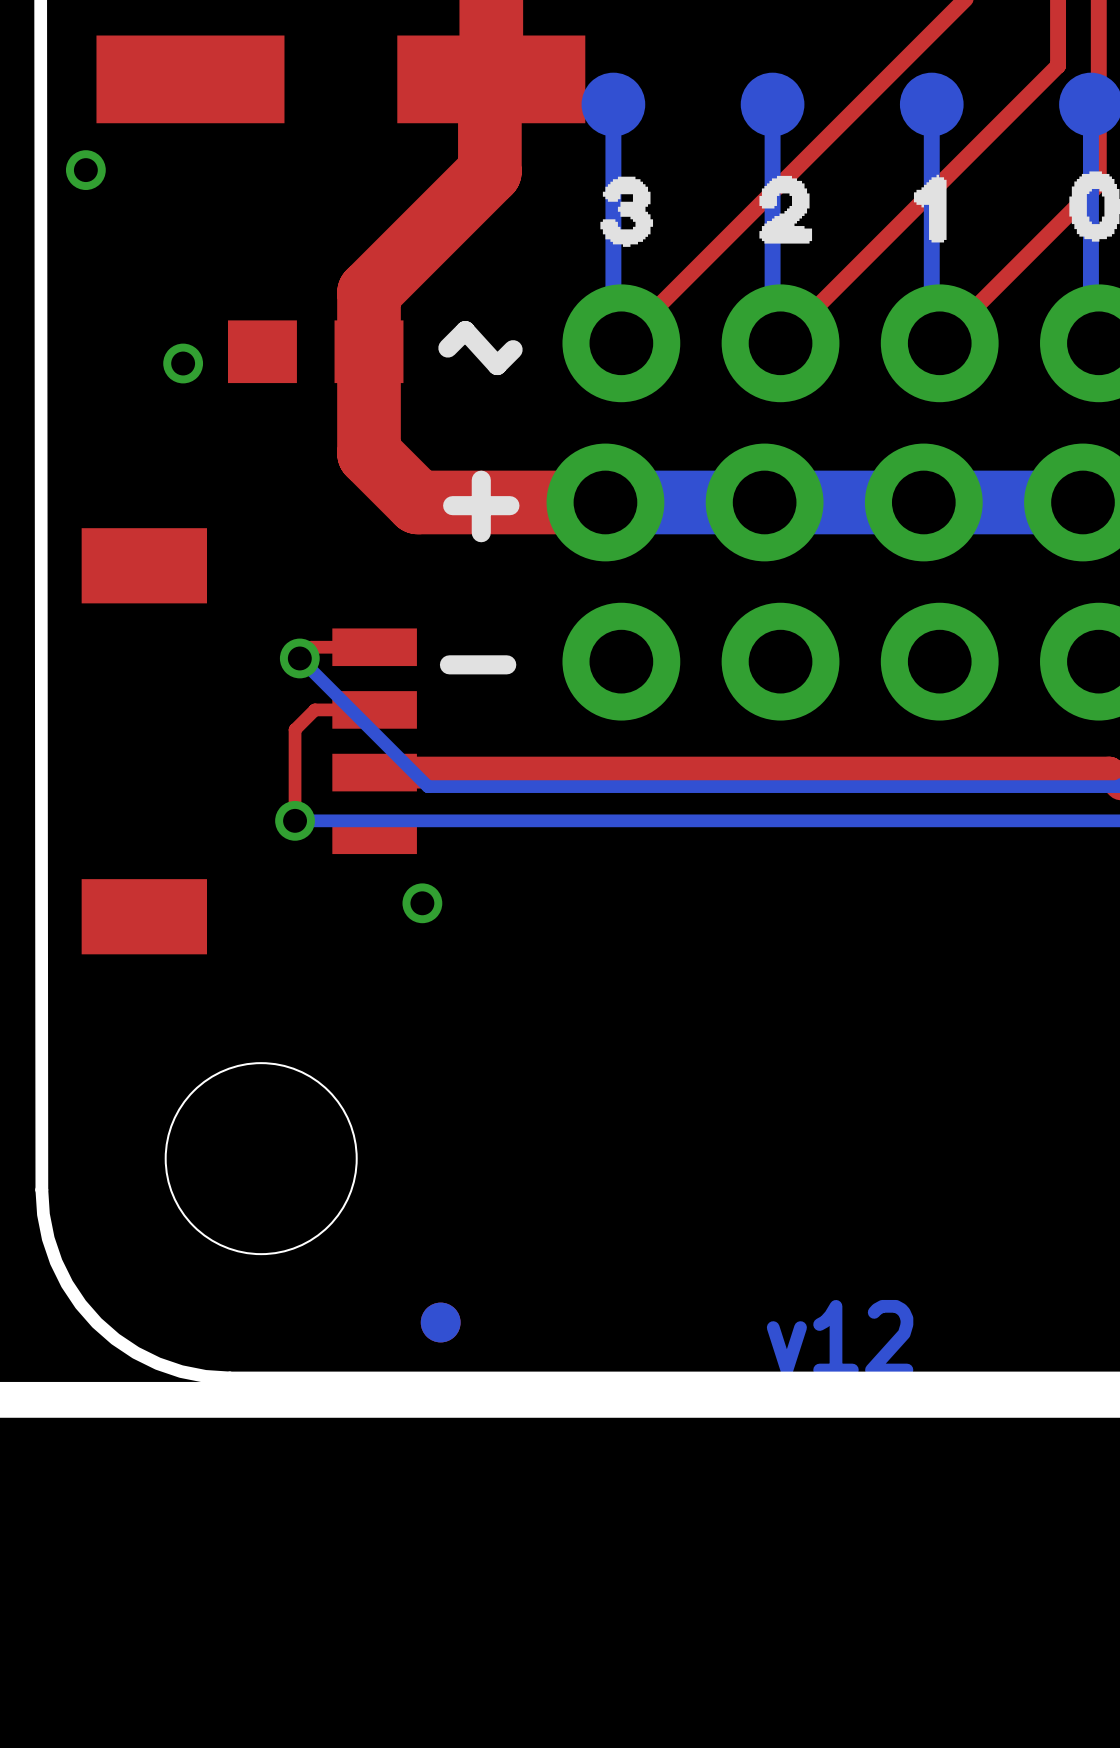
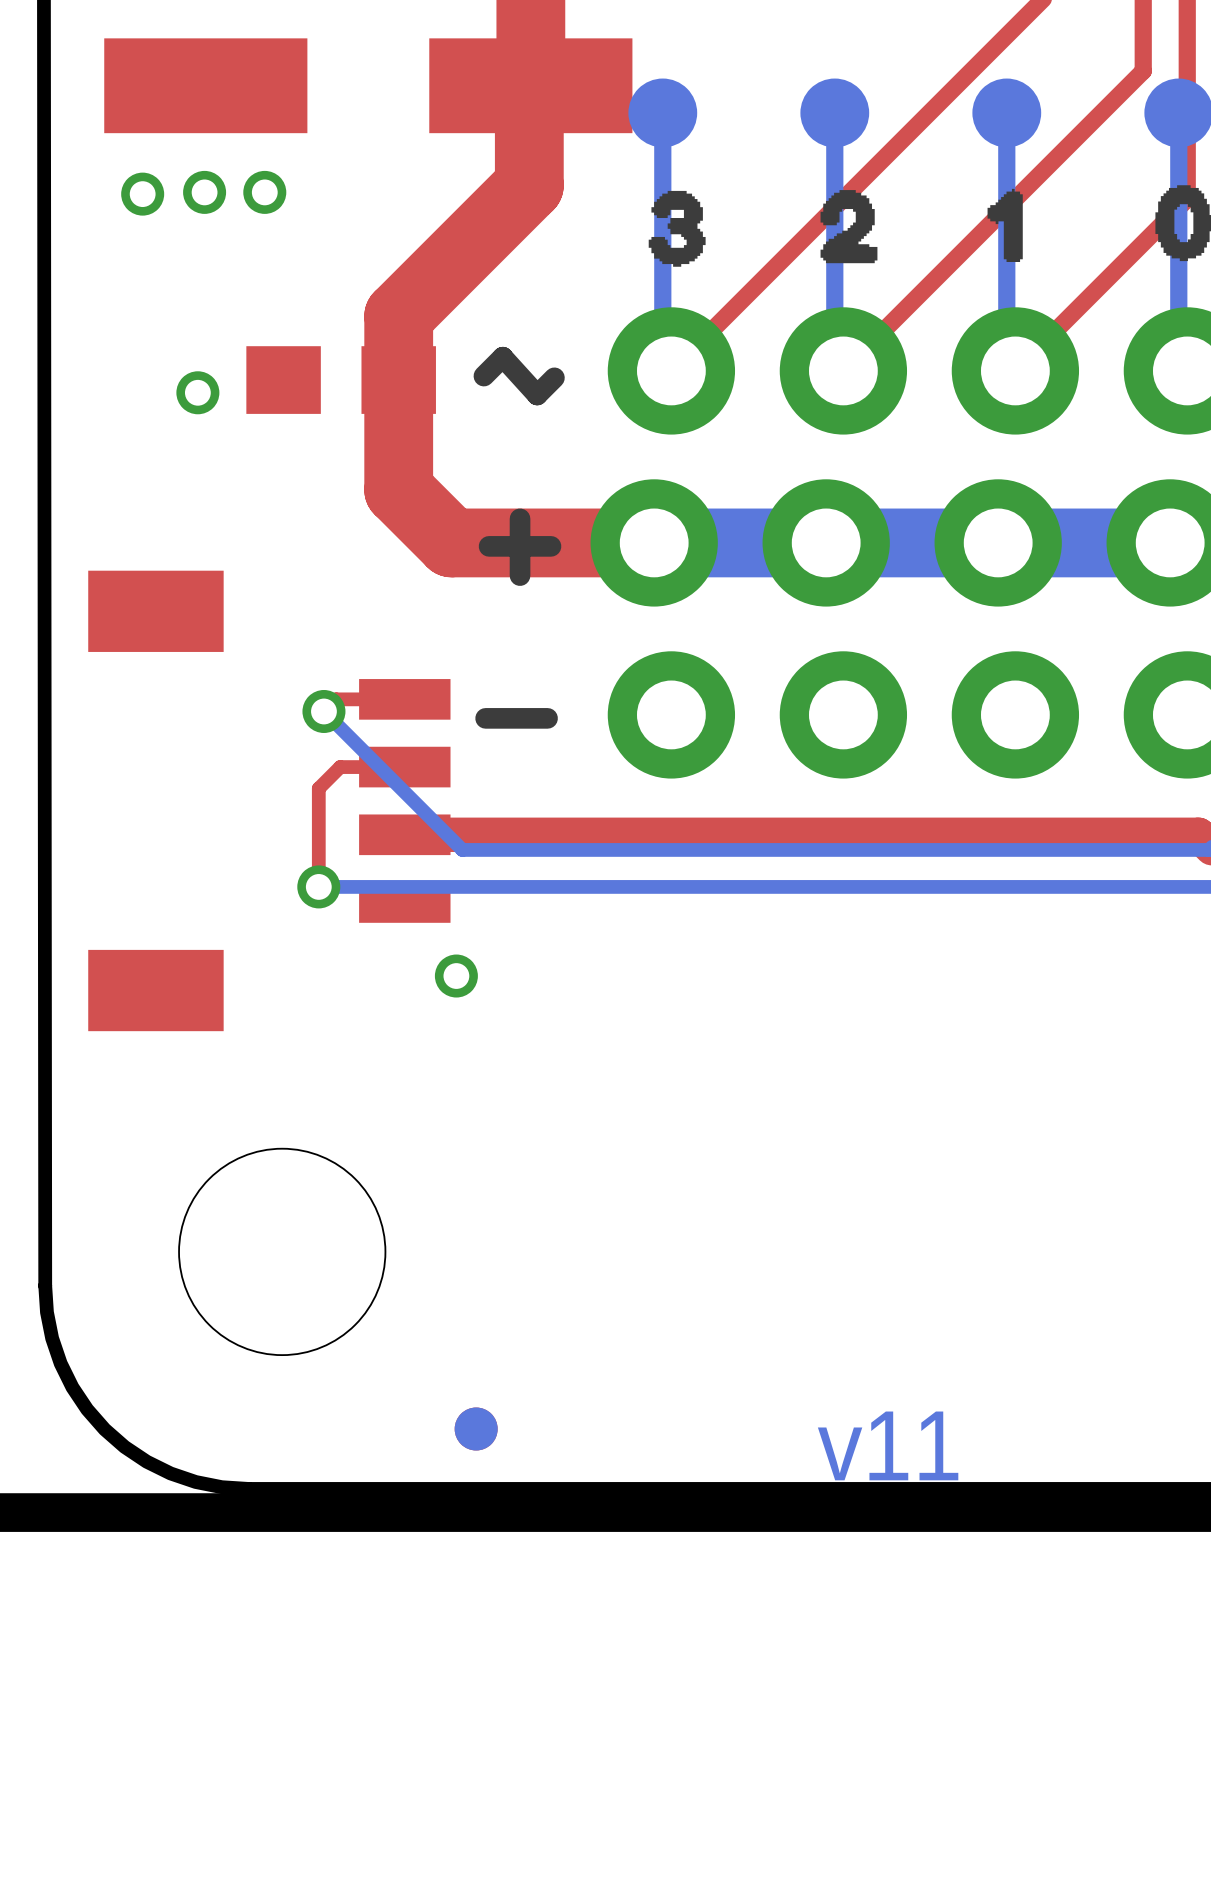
via position: (85, 170) -> (142, 194)
via: none -> (204, 192)
via: none -> (264, 192)
text: v12 (840, 1338) -> v11 (888, 1445)

